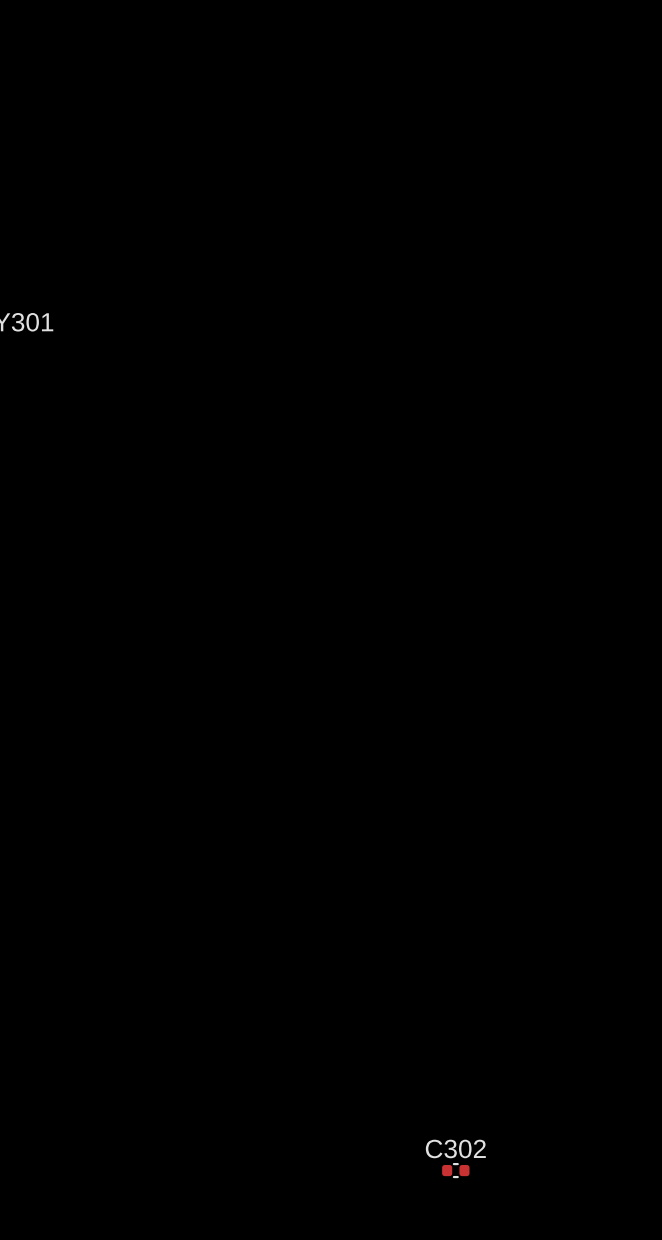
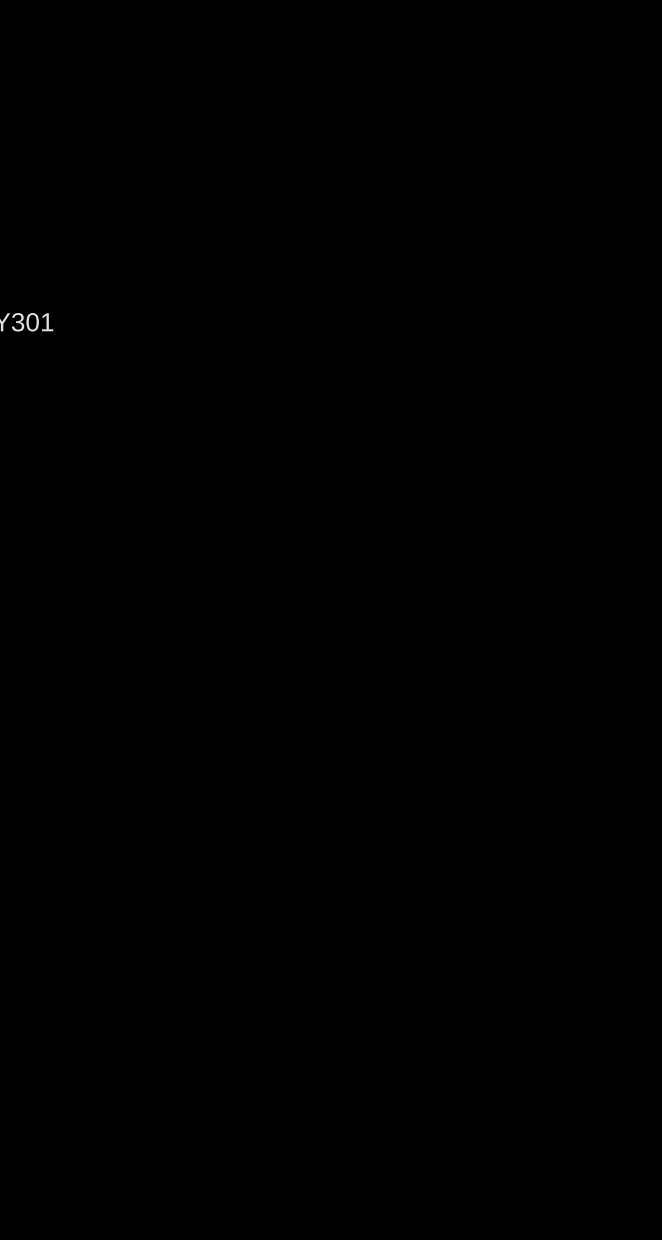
C302: (455, 1170) -> none

